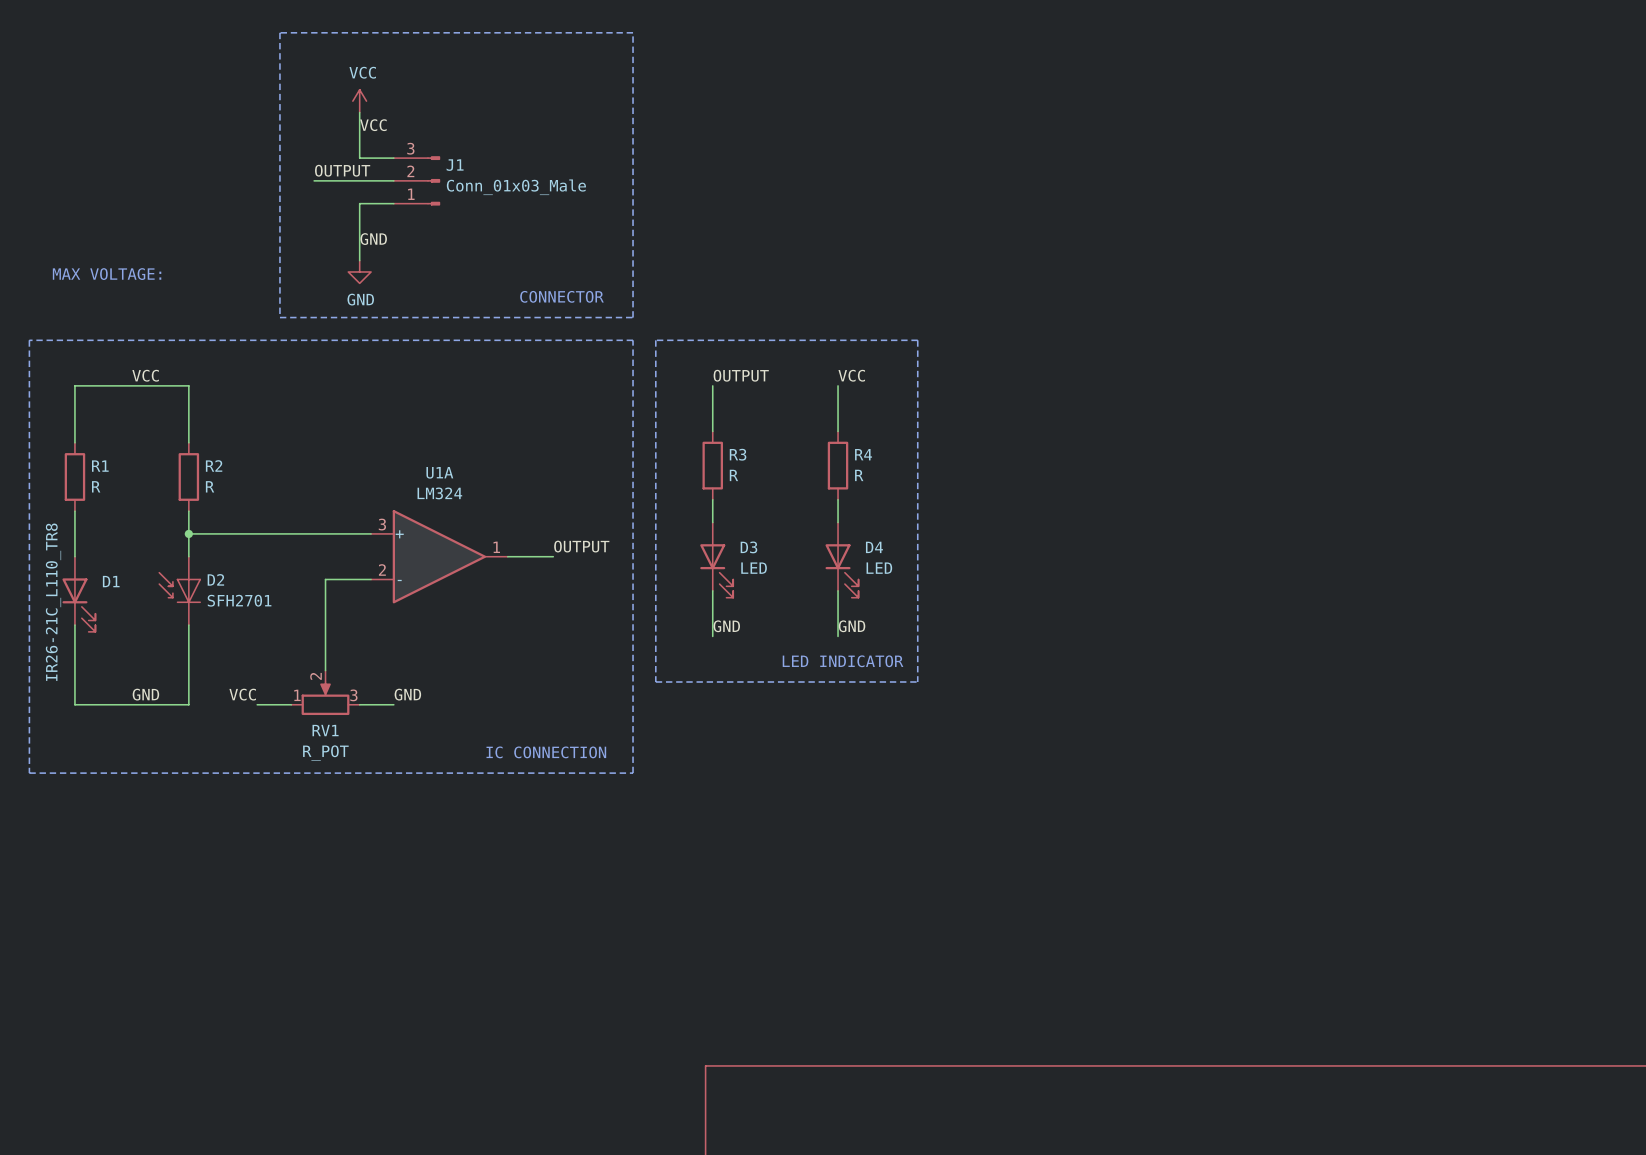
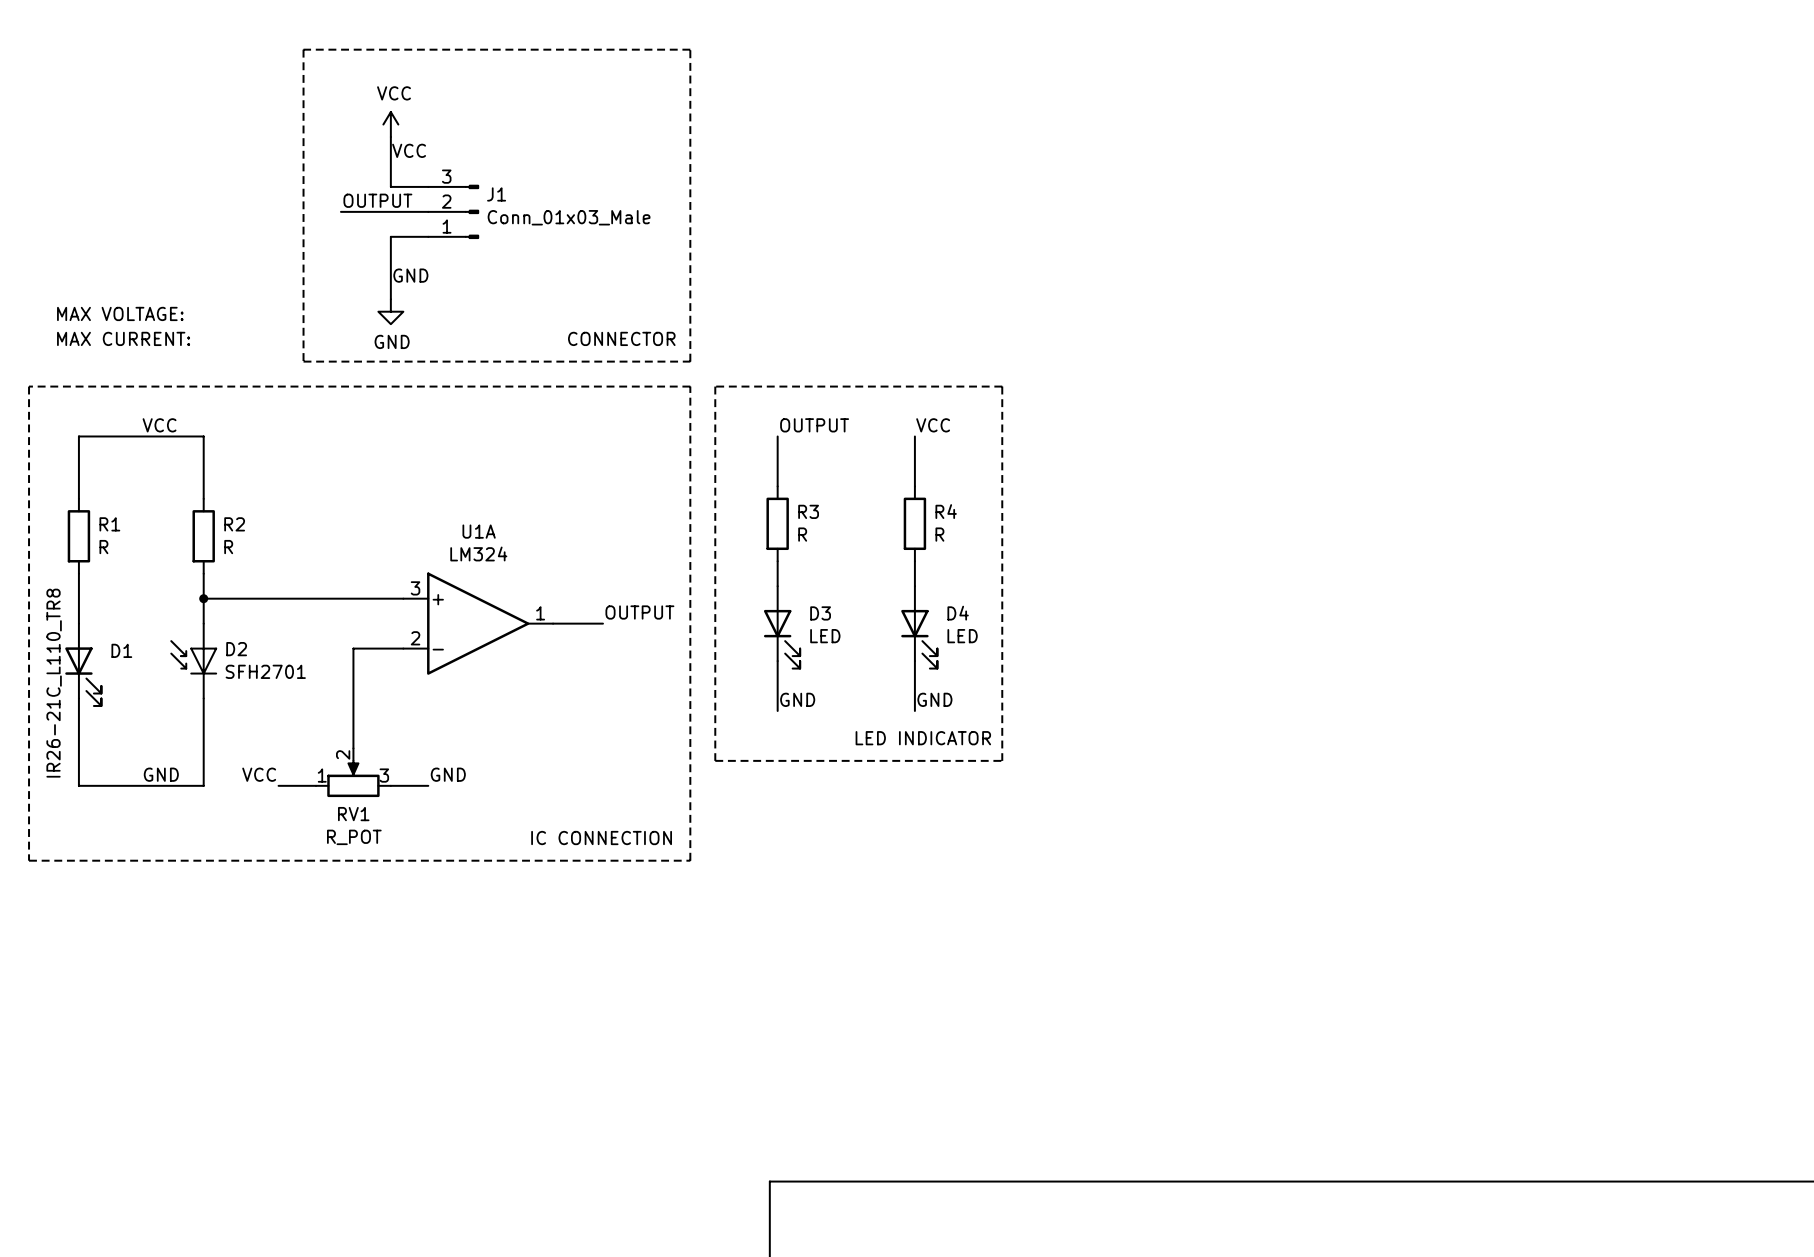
text: none -> MAX CURRENT: (123, 338)

